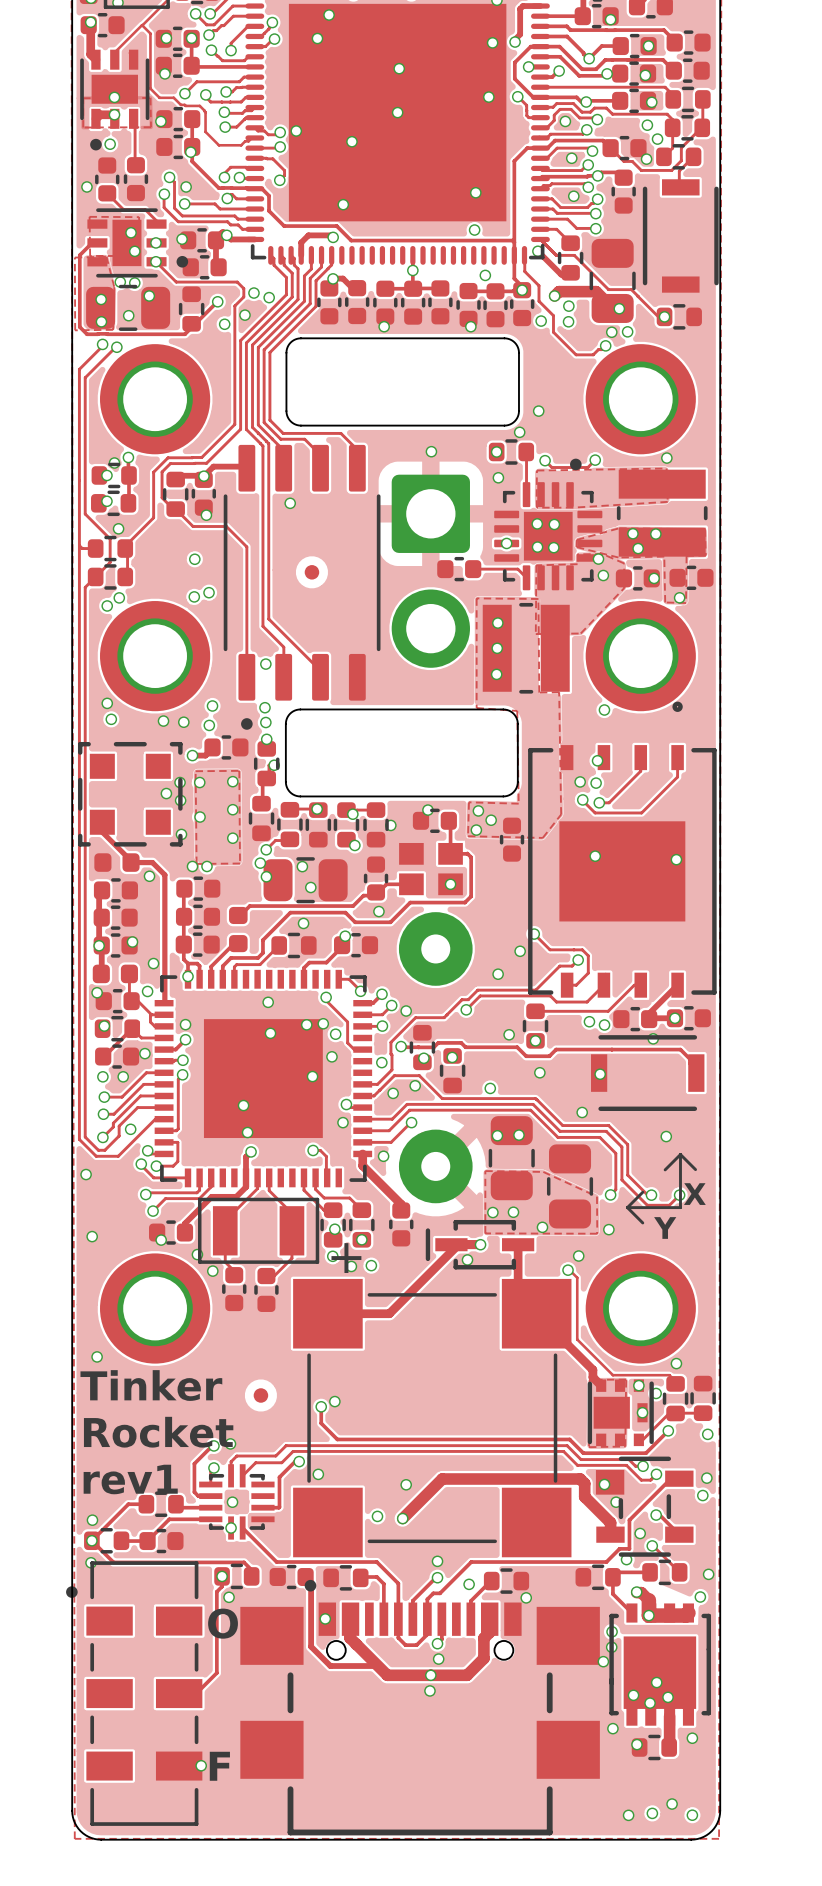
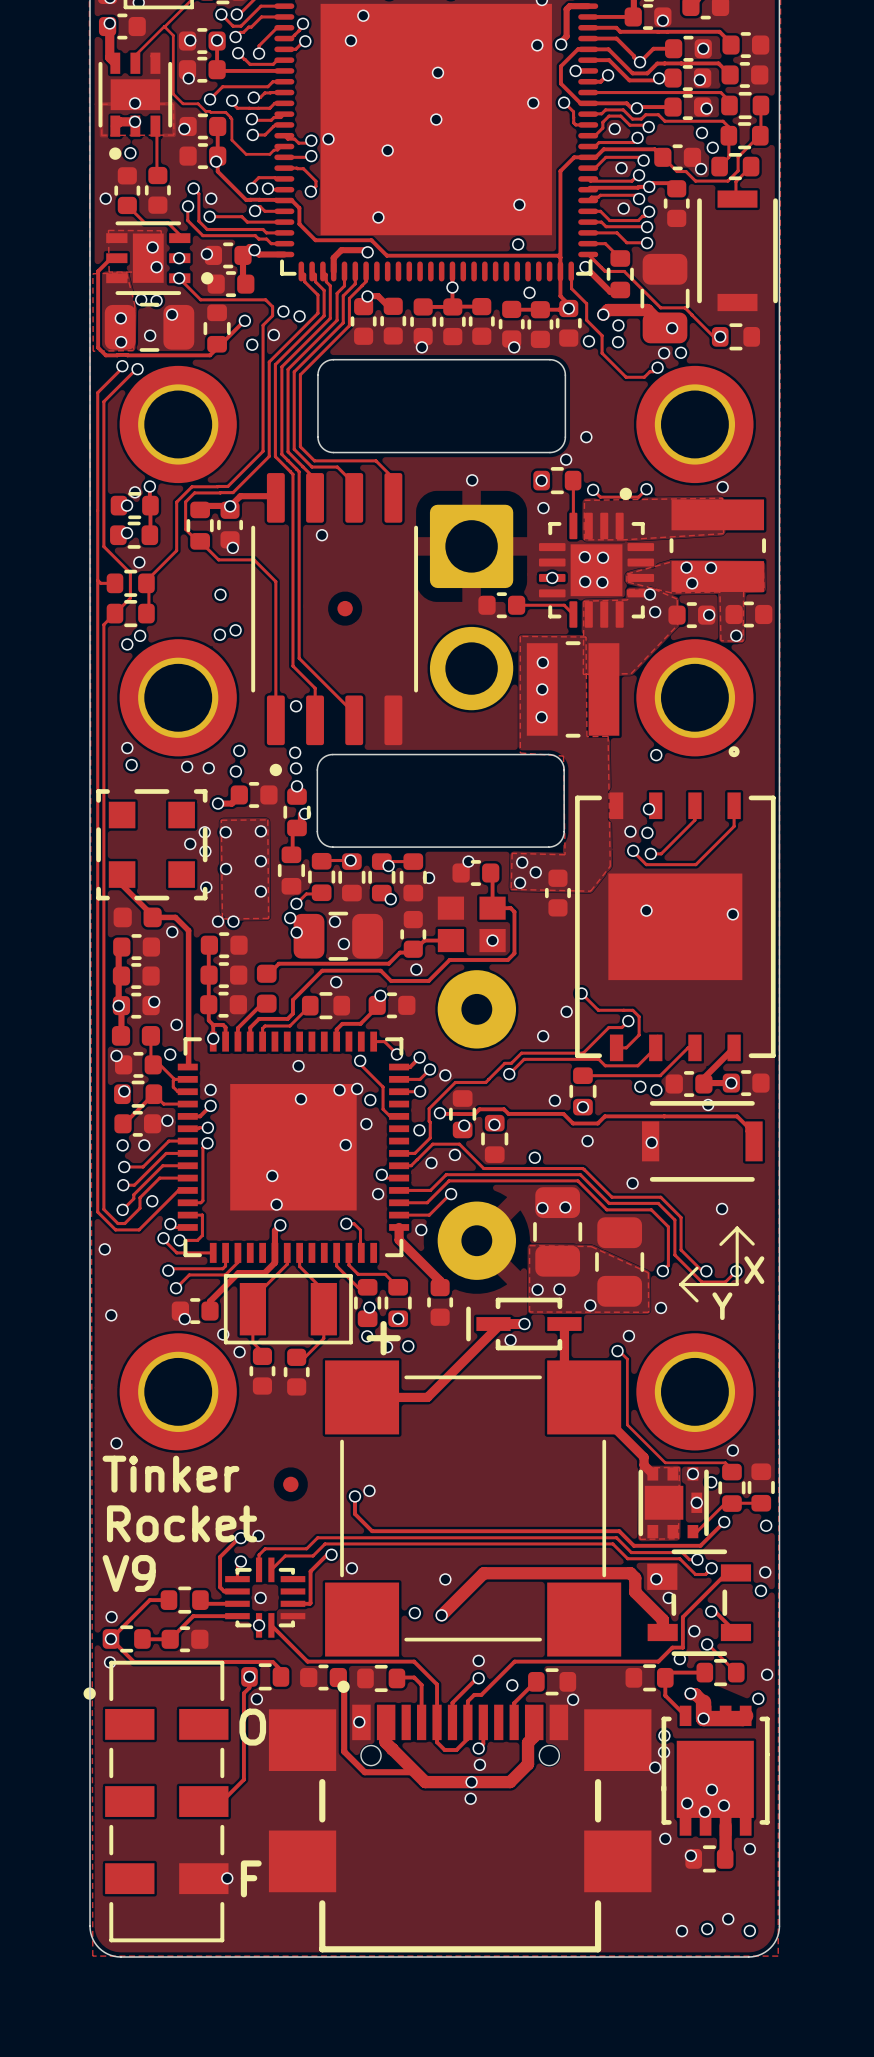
text: rev1 (130, 1479) -> V9 (129, 1573)

